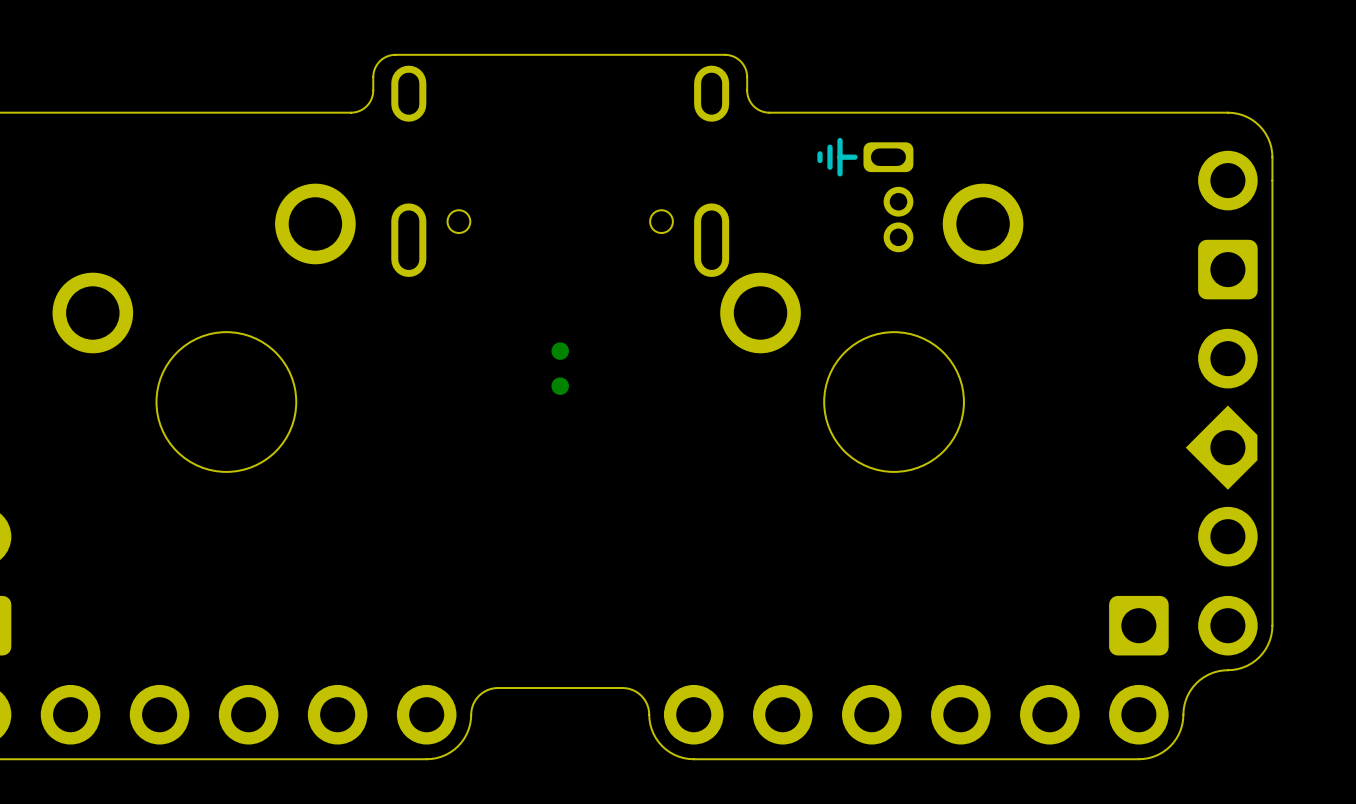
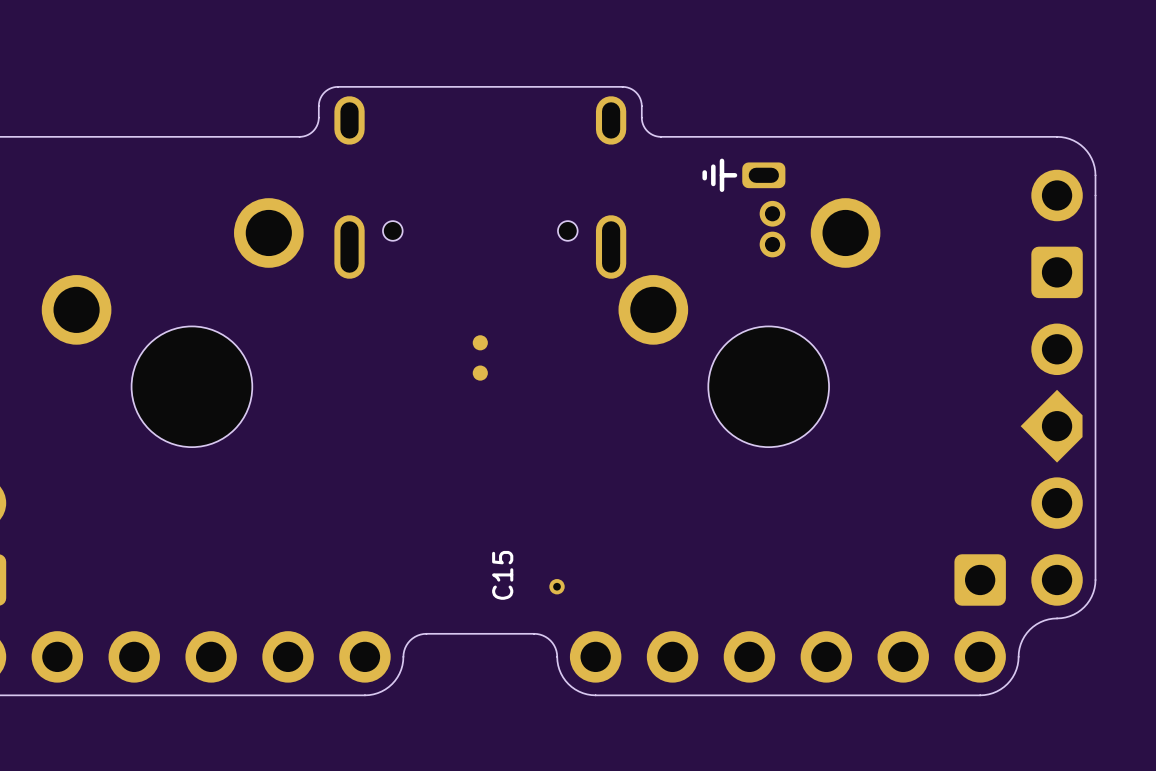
part: none -> C15 (557, 586)

